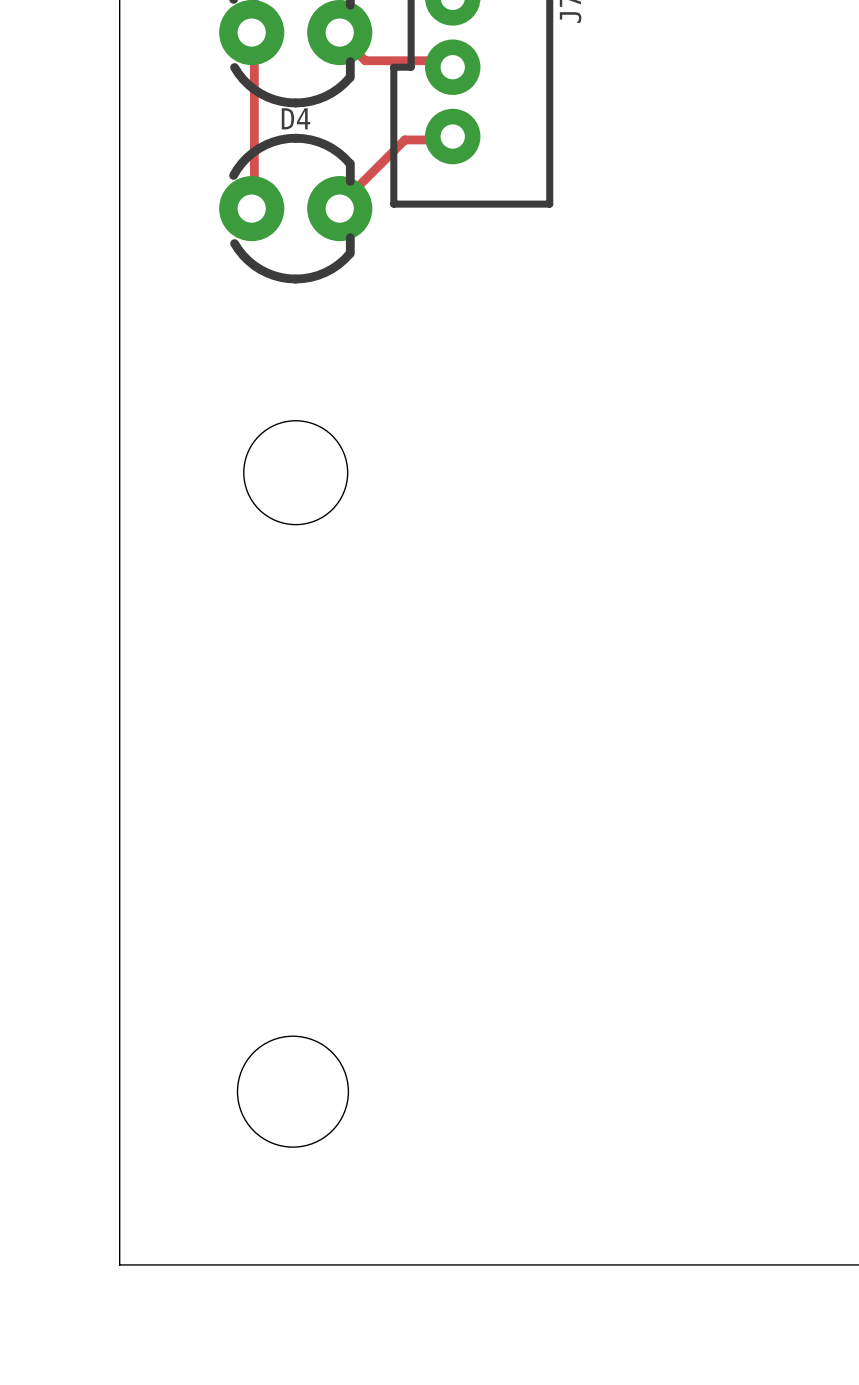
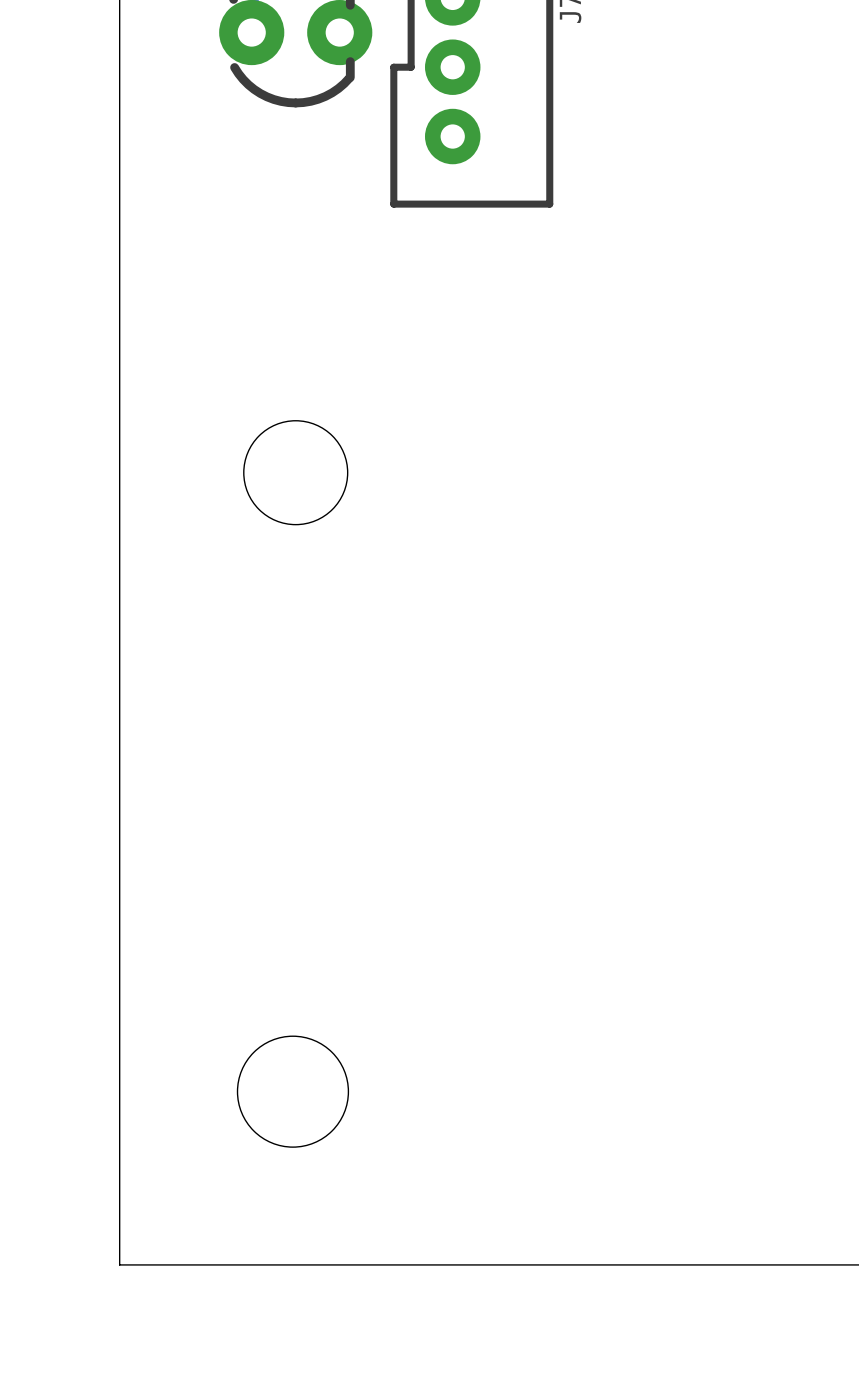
top track: (251, 32) (254, 36) (254, 203) (251, 208) -> none
top track: (339, 32) (341, 36) (365, 60) (452, 60) (452, 67) -> none
top track: (452, 136) (452, 139) (404, 139) (341, 203) (339, 208) -> none
D4: (295, 208) -> none

